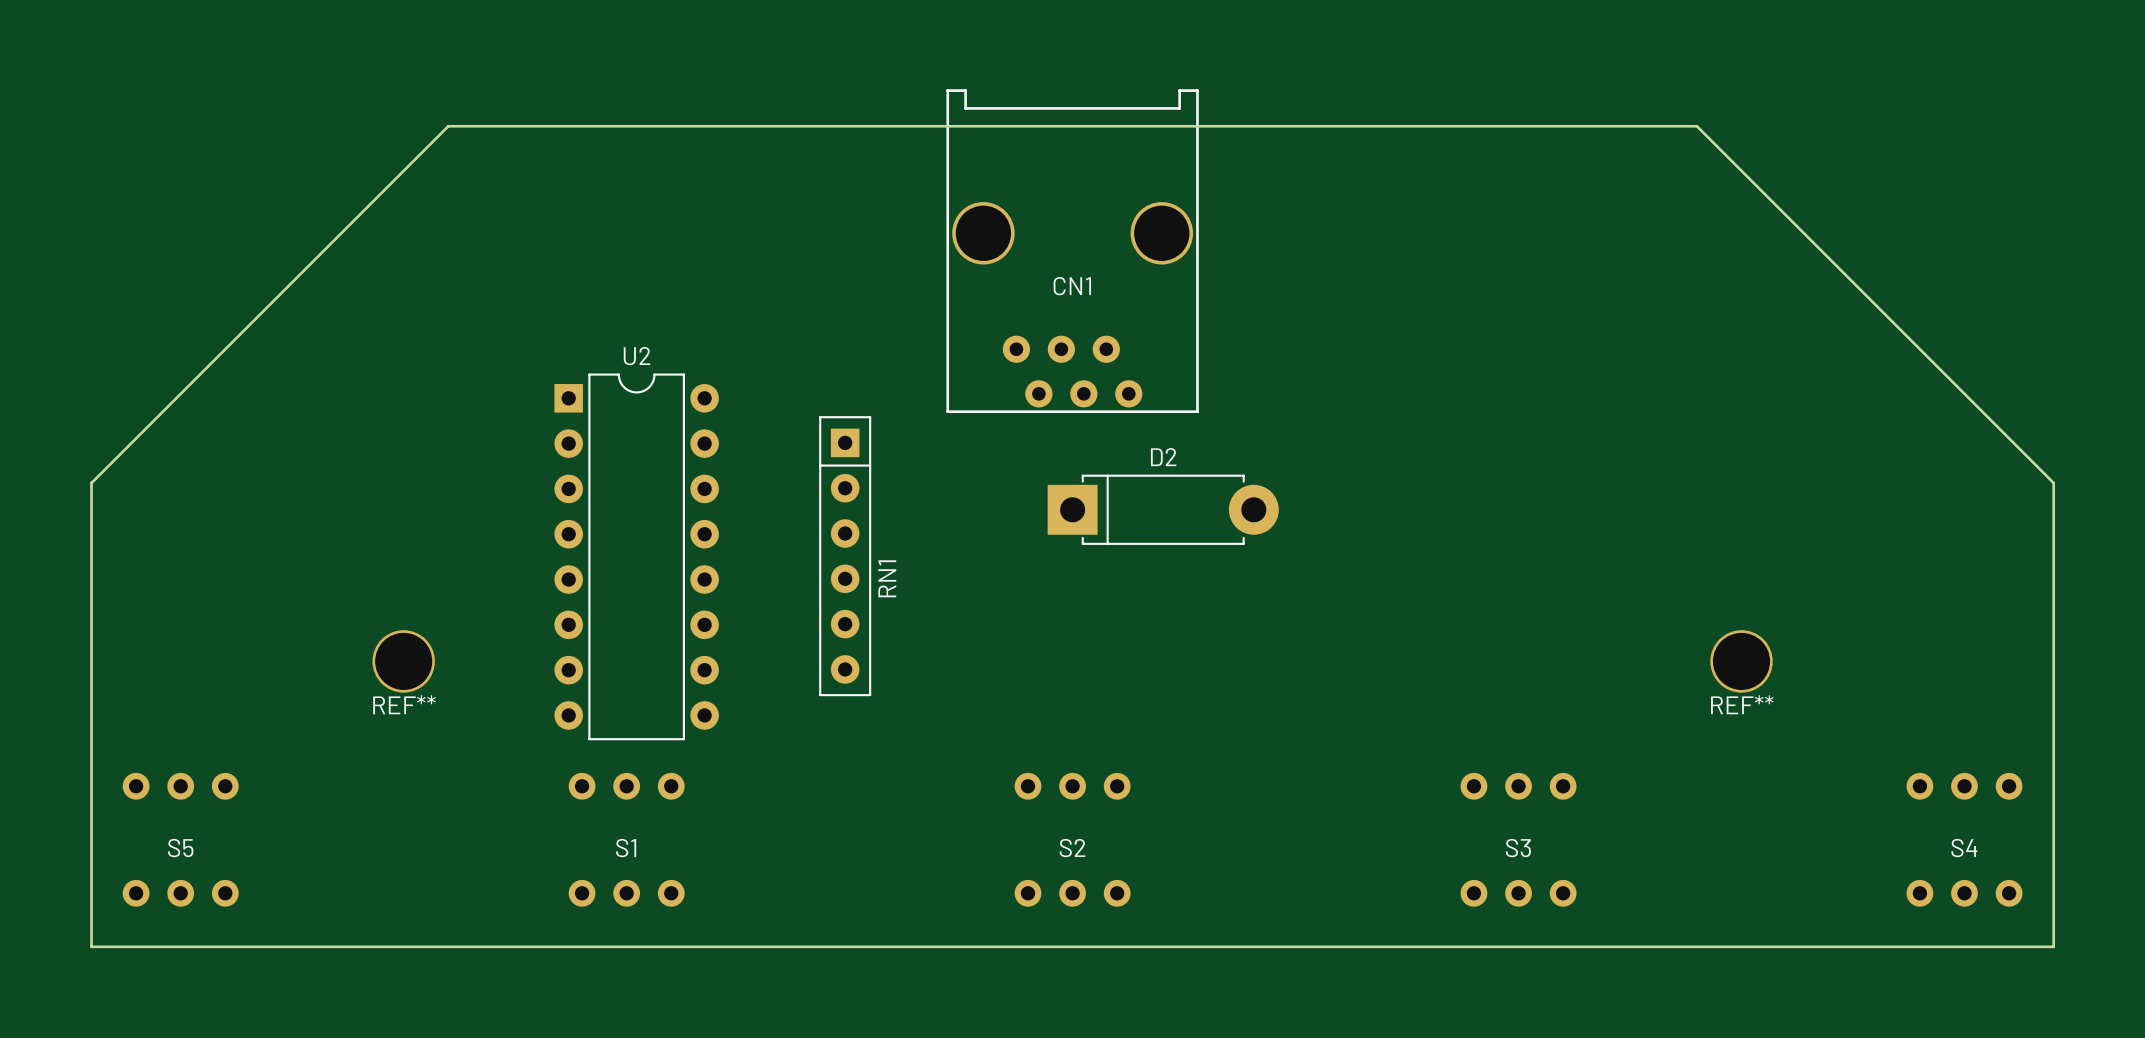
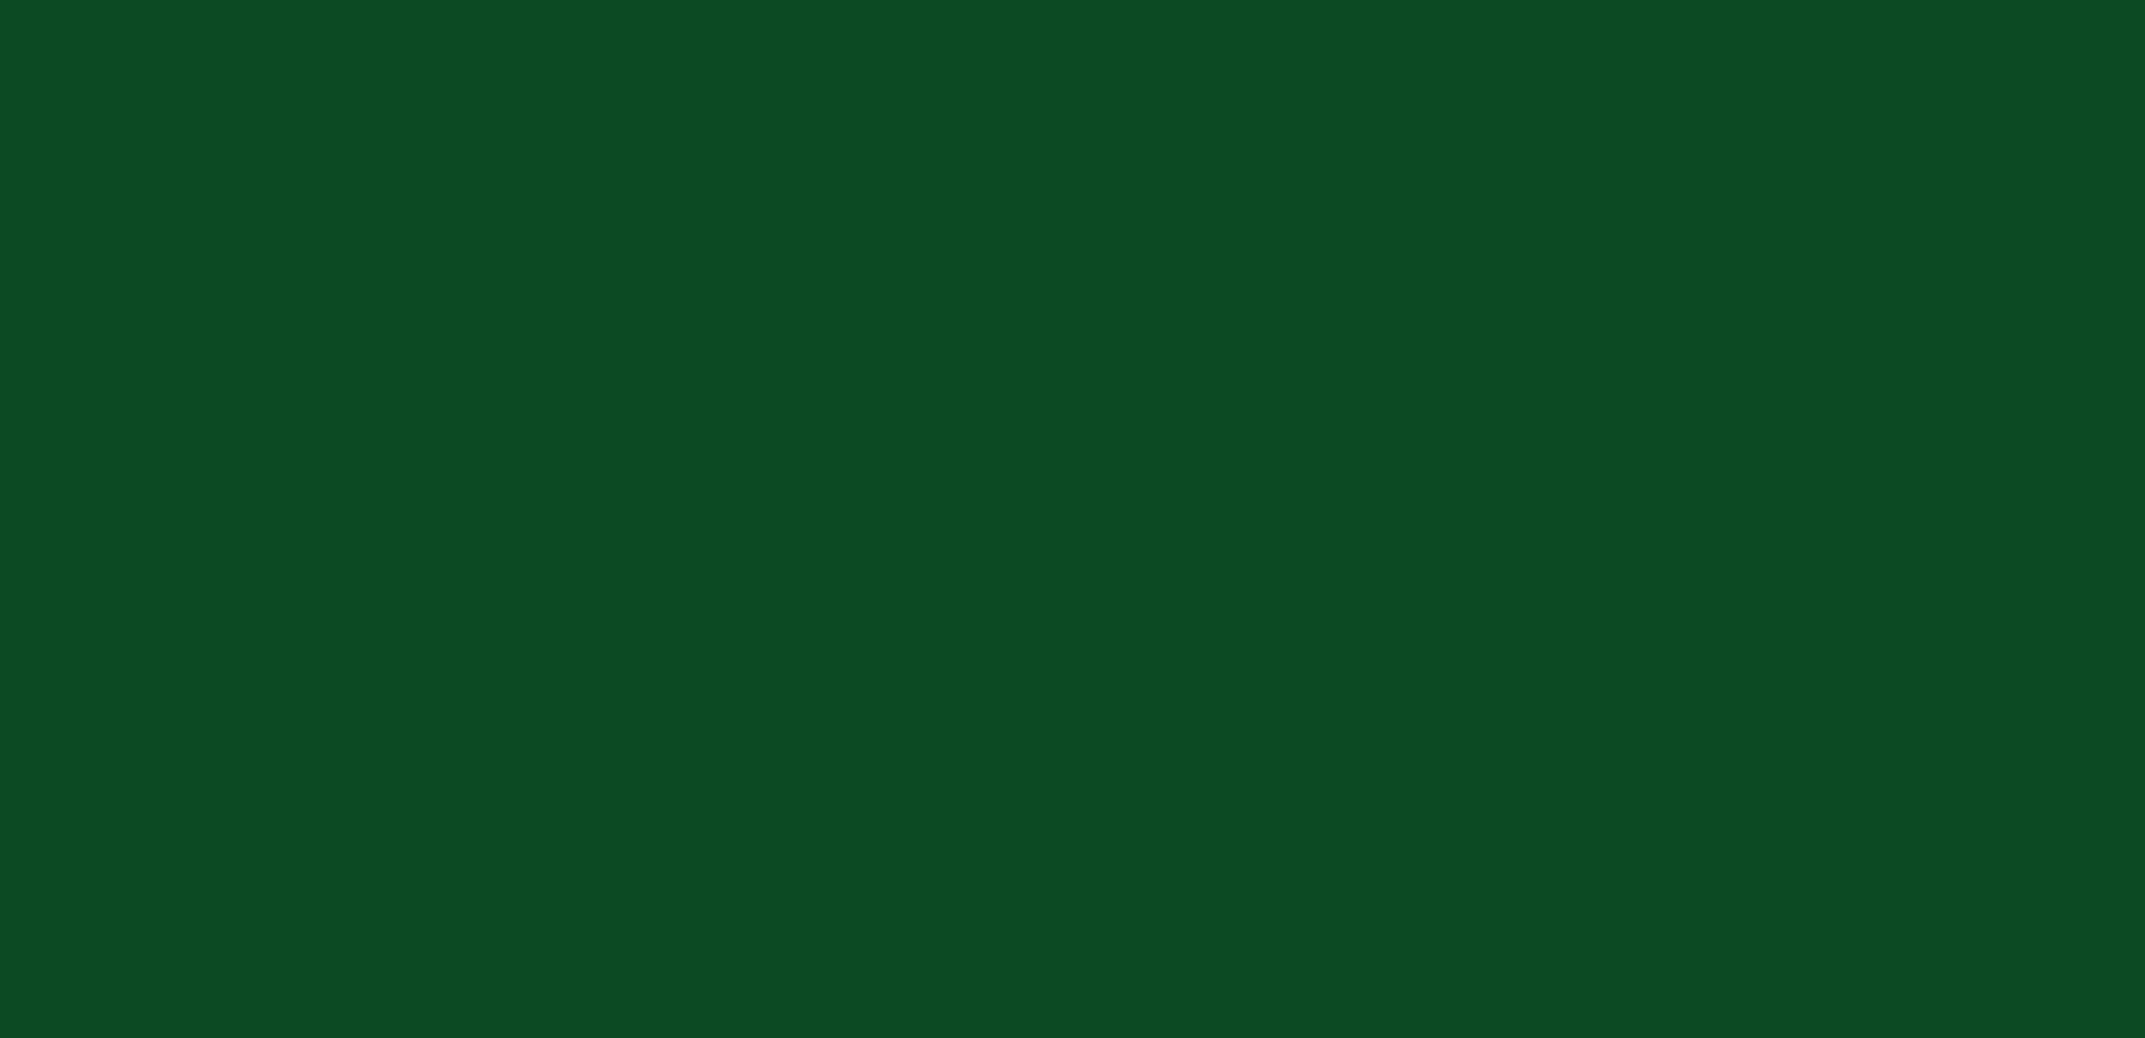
board edge: (448, 126) (91, 483) (91, 946) (2053, 946) (2053, 483) (1696, 126) (448, 126) -> none
CN1: (1072, 251) -> none
D2: (1163, 509) -> none
U2: (636, 556) -> none
RN1: (845, 556) -> none
REF**: (403, 661) -> none
REF**: (1741, 661) -> none
S5: (180, 839) -> none
S1: (626, 839) -> none
S2: (1072, 839) -> none
S3: (1518, 839) -> none
S4: (1964, 839) -> none

